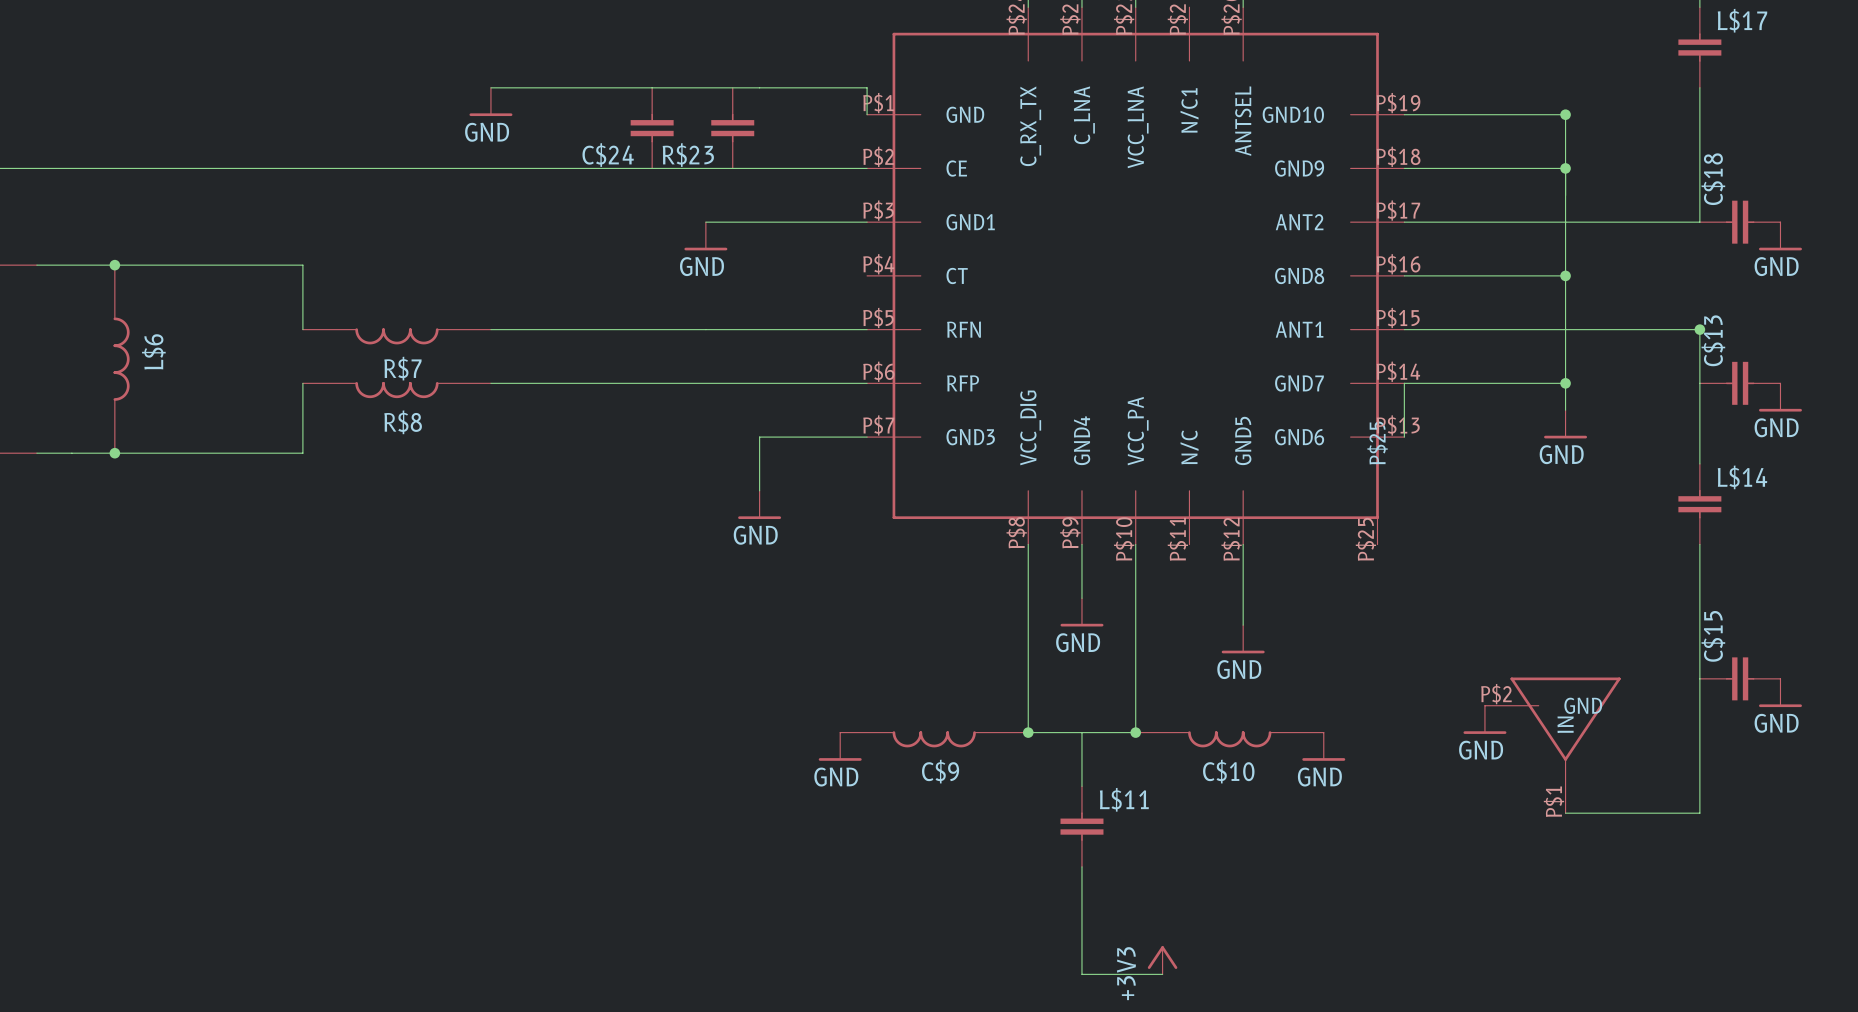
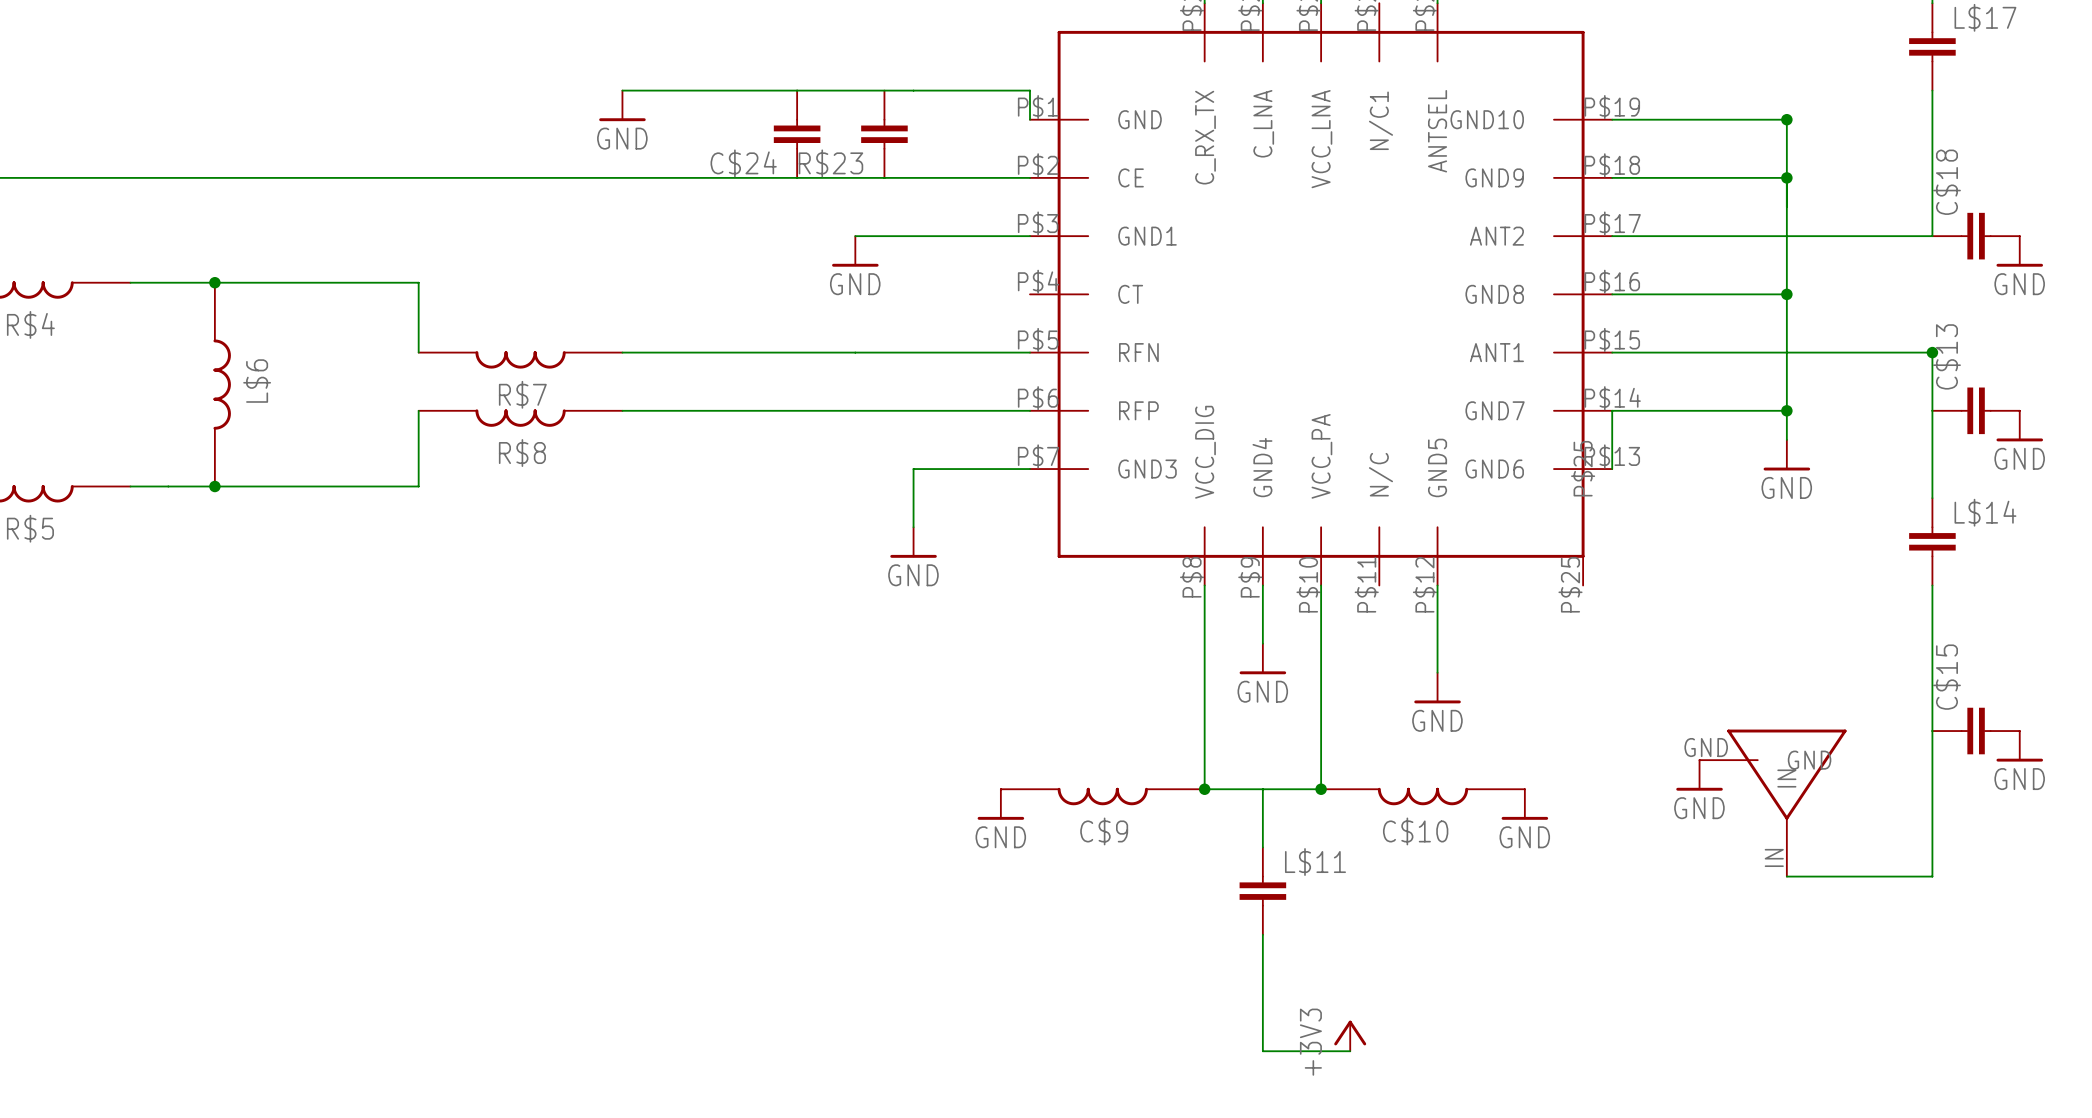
part pin number: P$2 (1496, 694) -> GND (1706, 747)
part pin number: P$1 (1553, 801) -> IN (1774, 857)

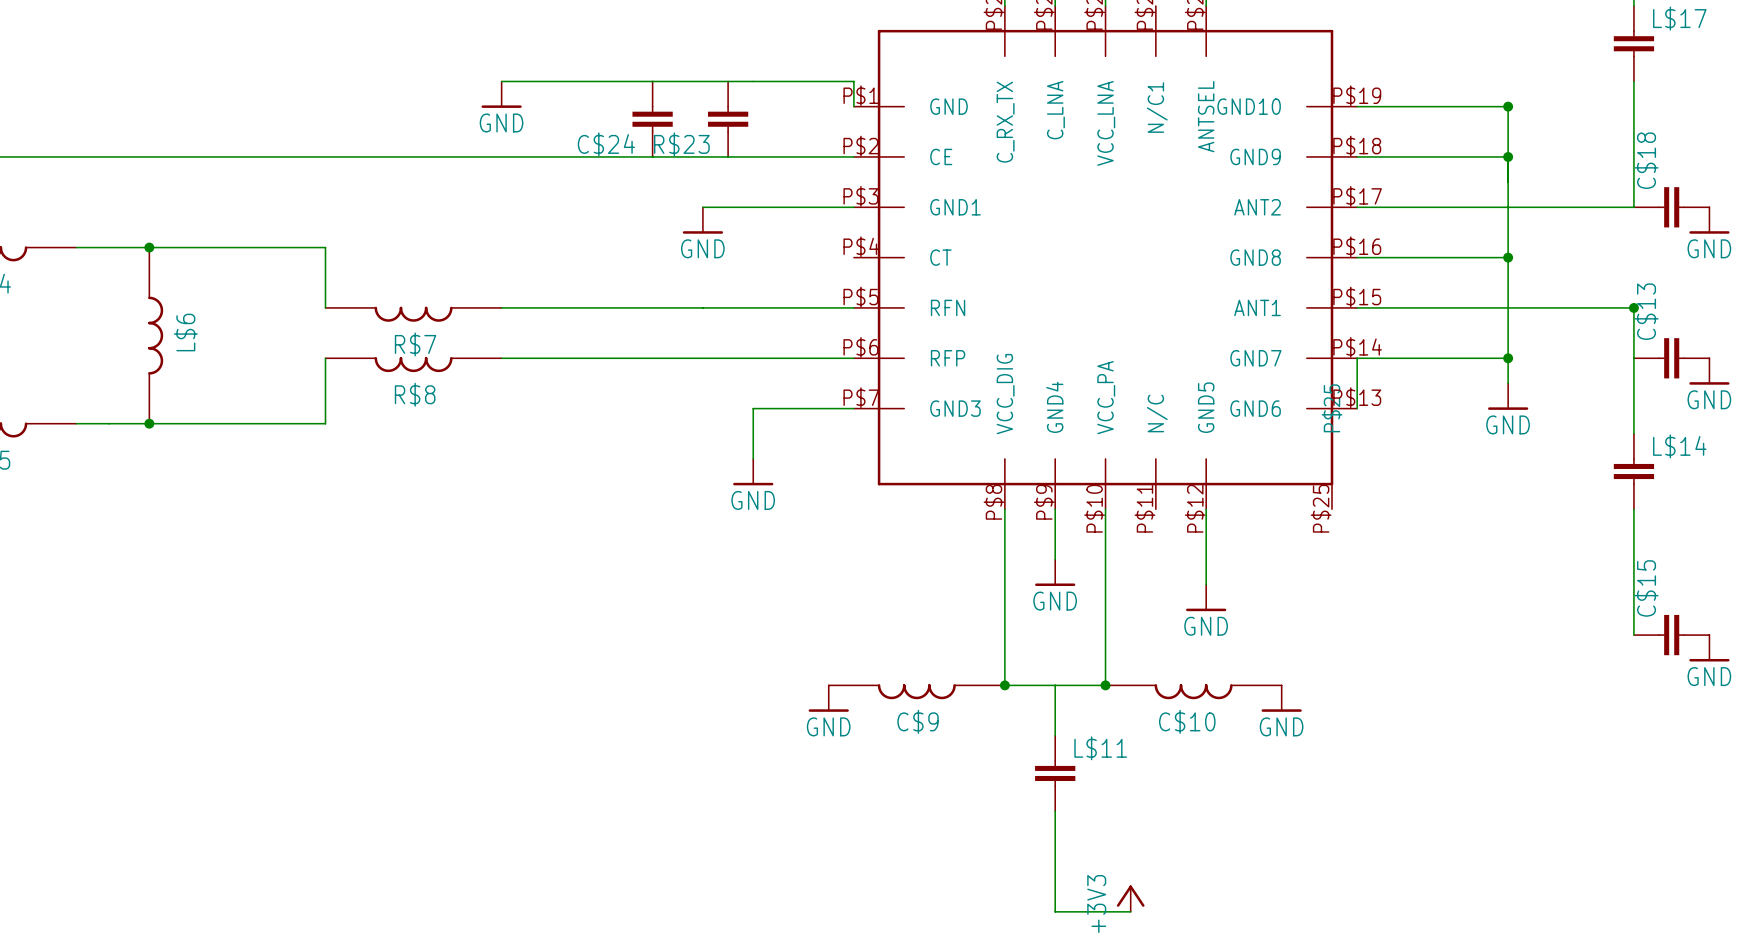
wire: (1932, 731) (1932, 876) (1786, 876) -> none
power symbol: GND (1699, 775) -> none
part: (1773, 803) -> none

